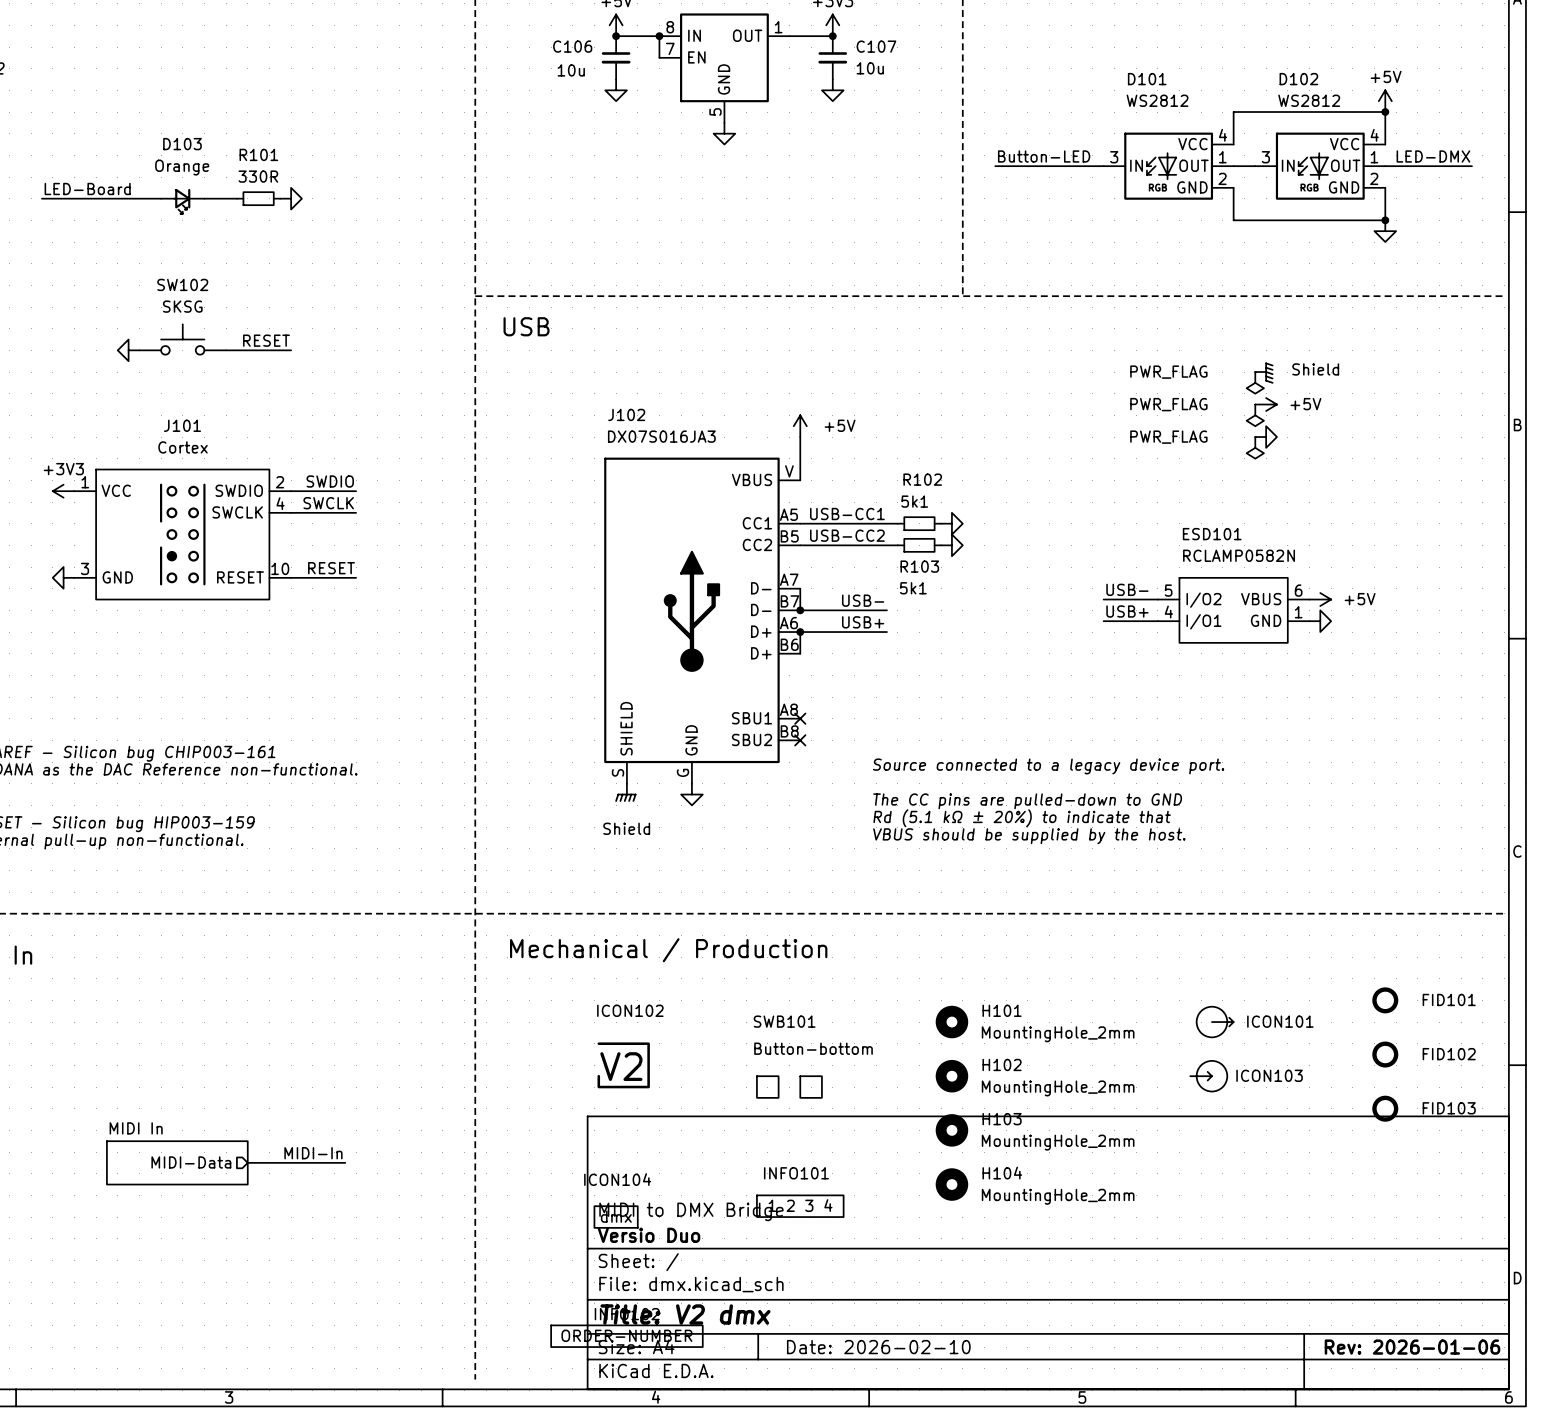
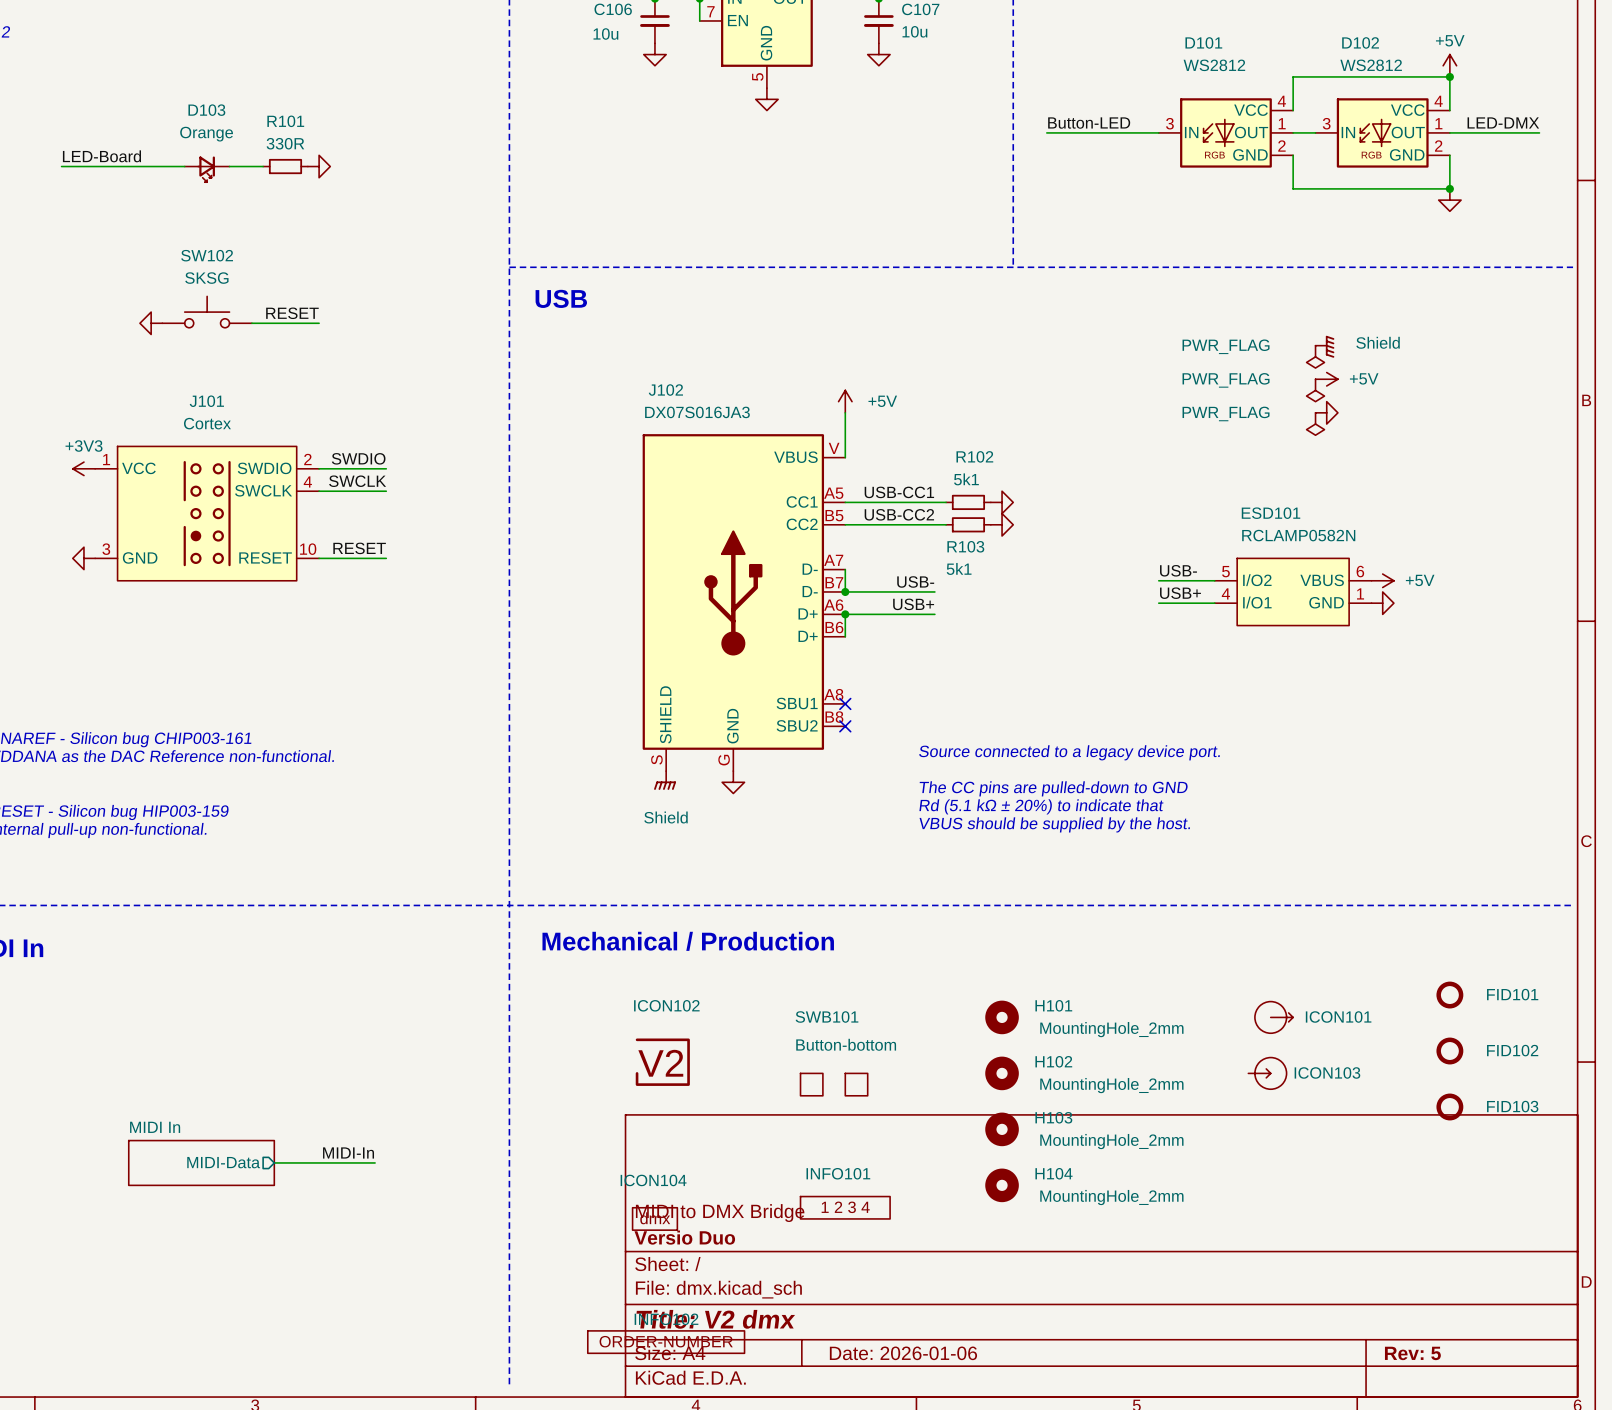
title block: Date: 2026-02-10 (878, 1347) -> Date: 2026-01-06 (903, 1353)
title block: Rev: 2026-01-06 (1412, 1347) -> Rev: 5 (1412, 1353)

